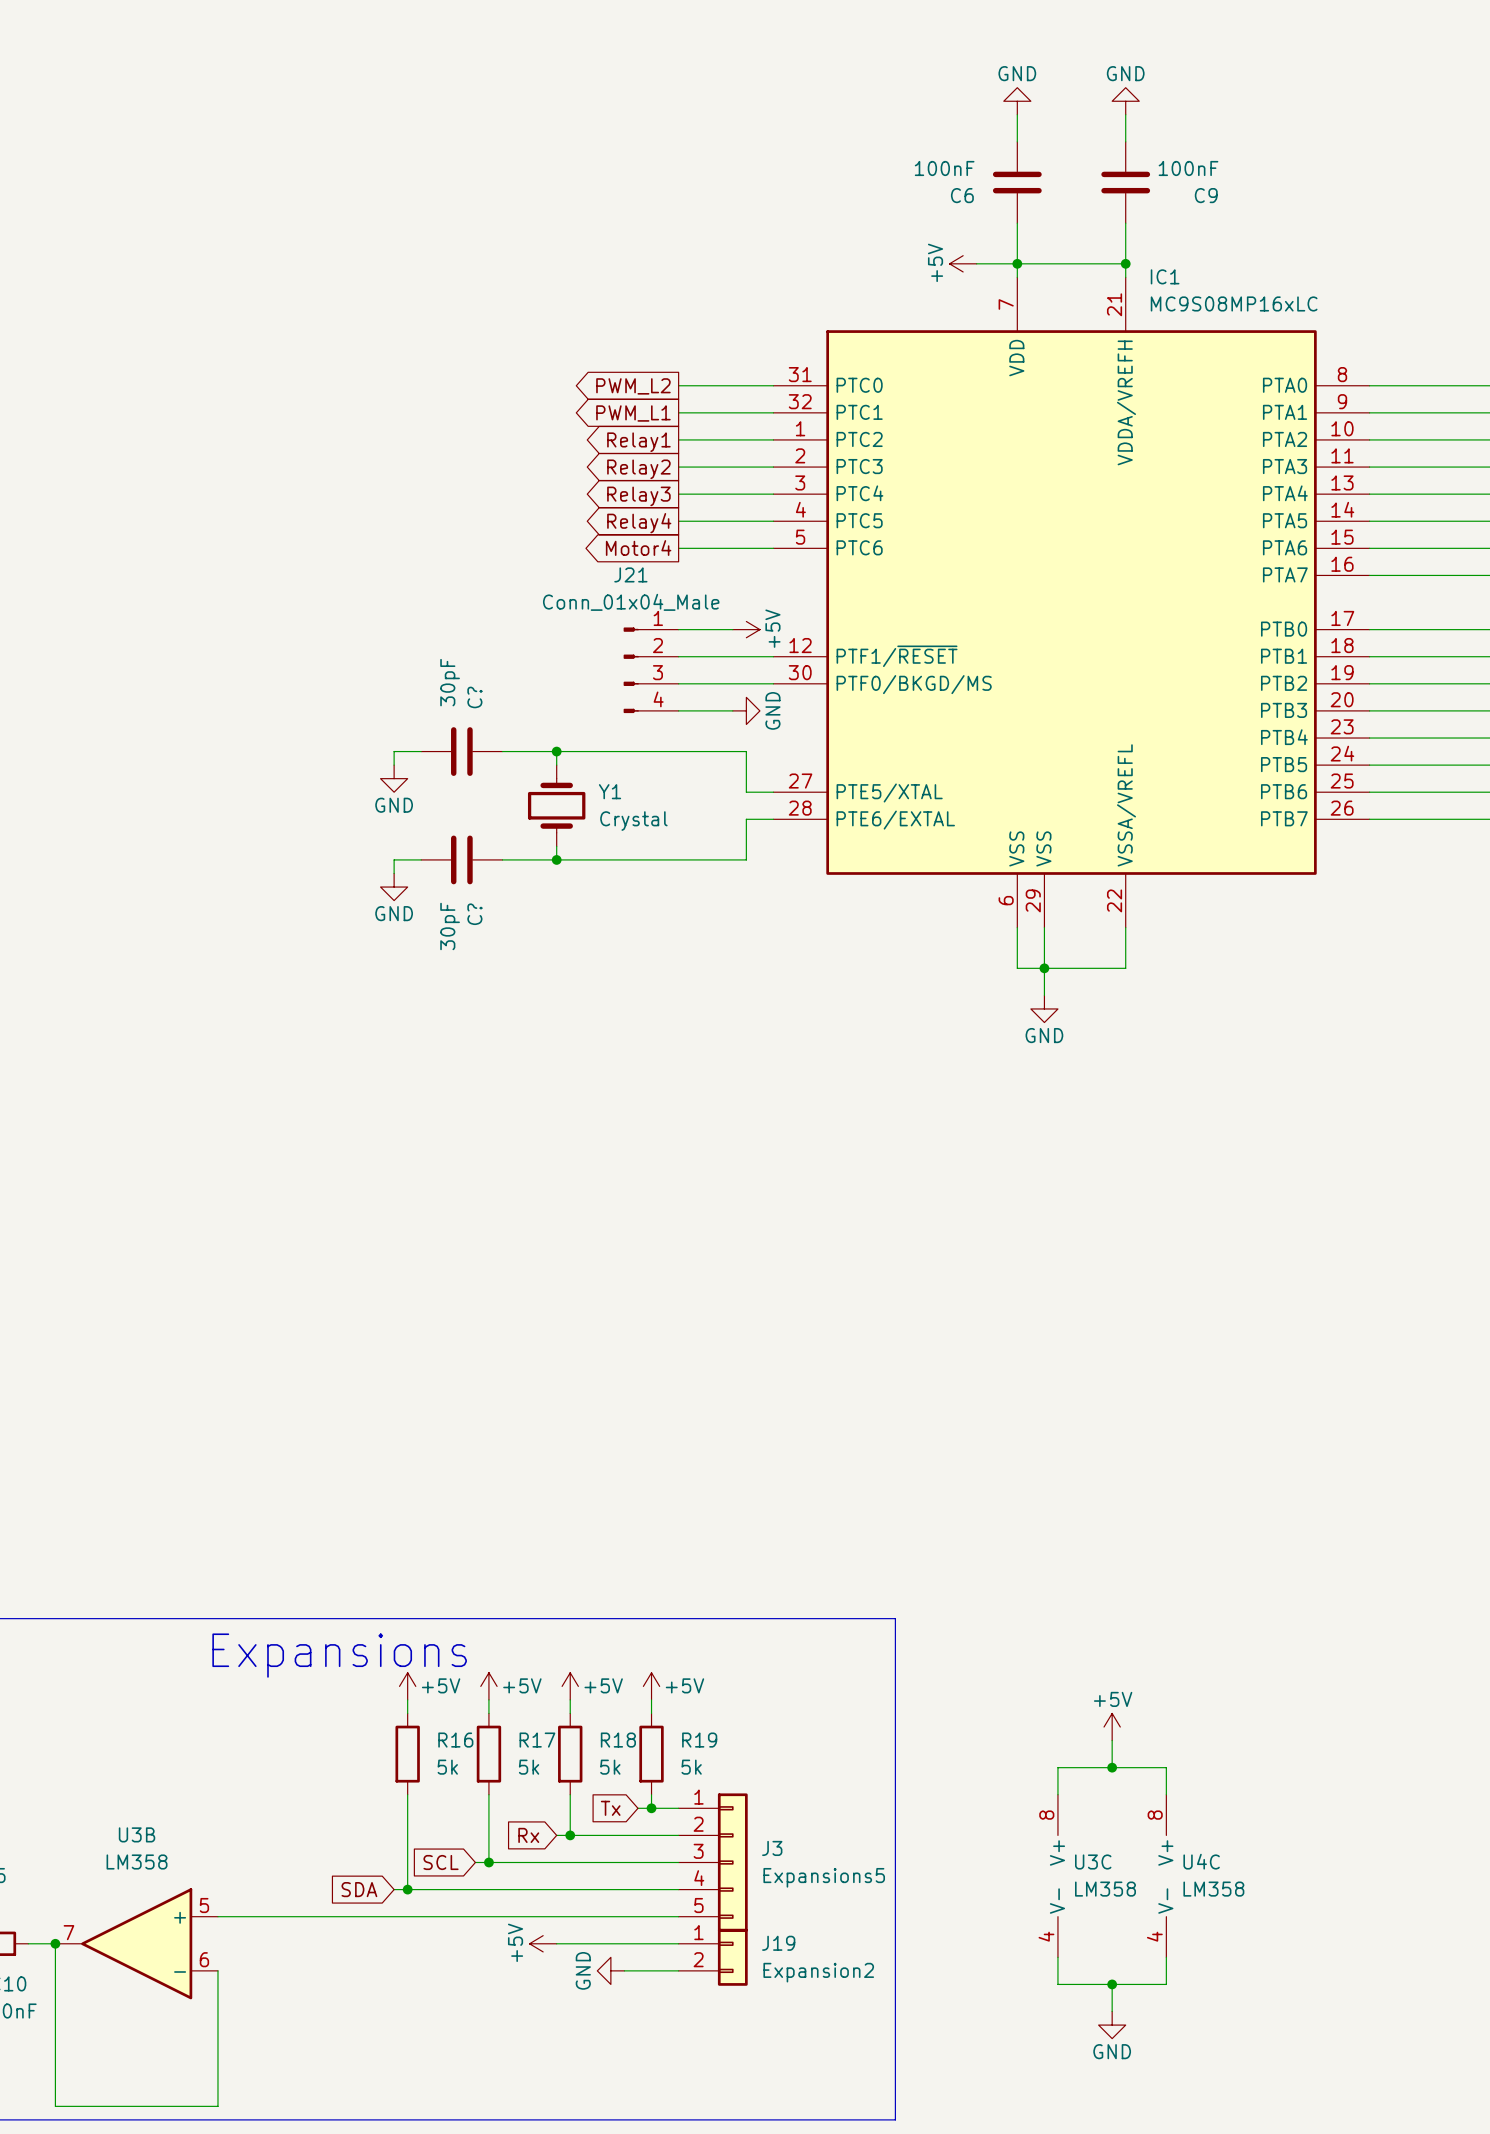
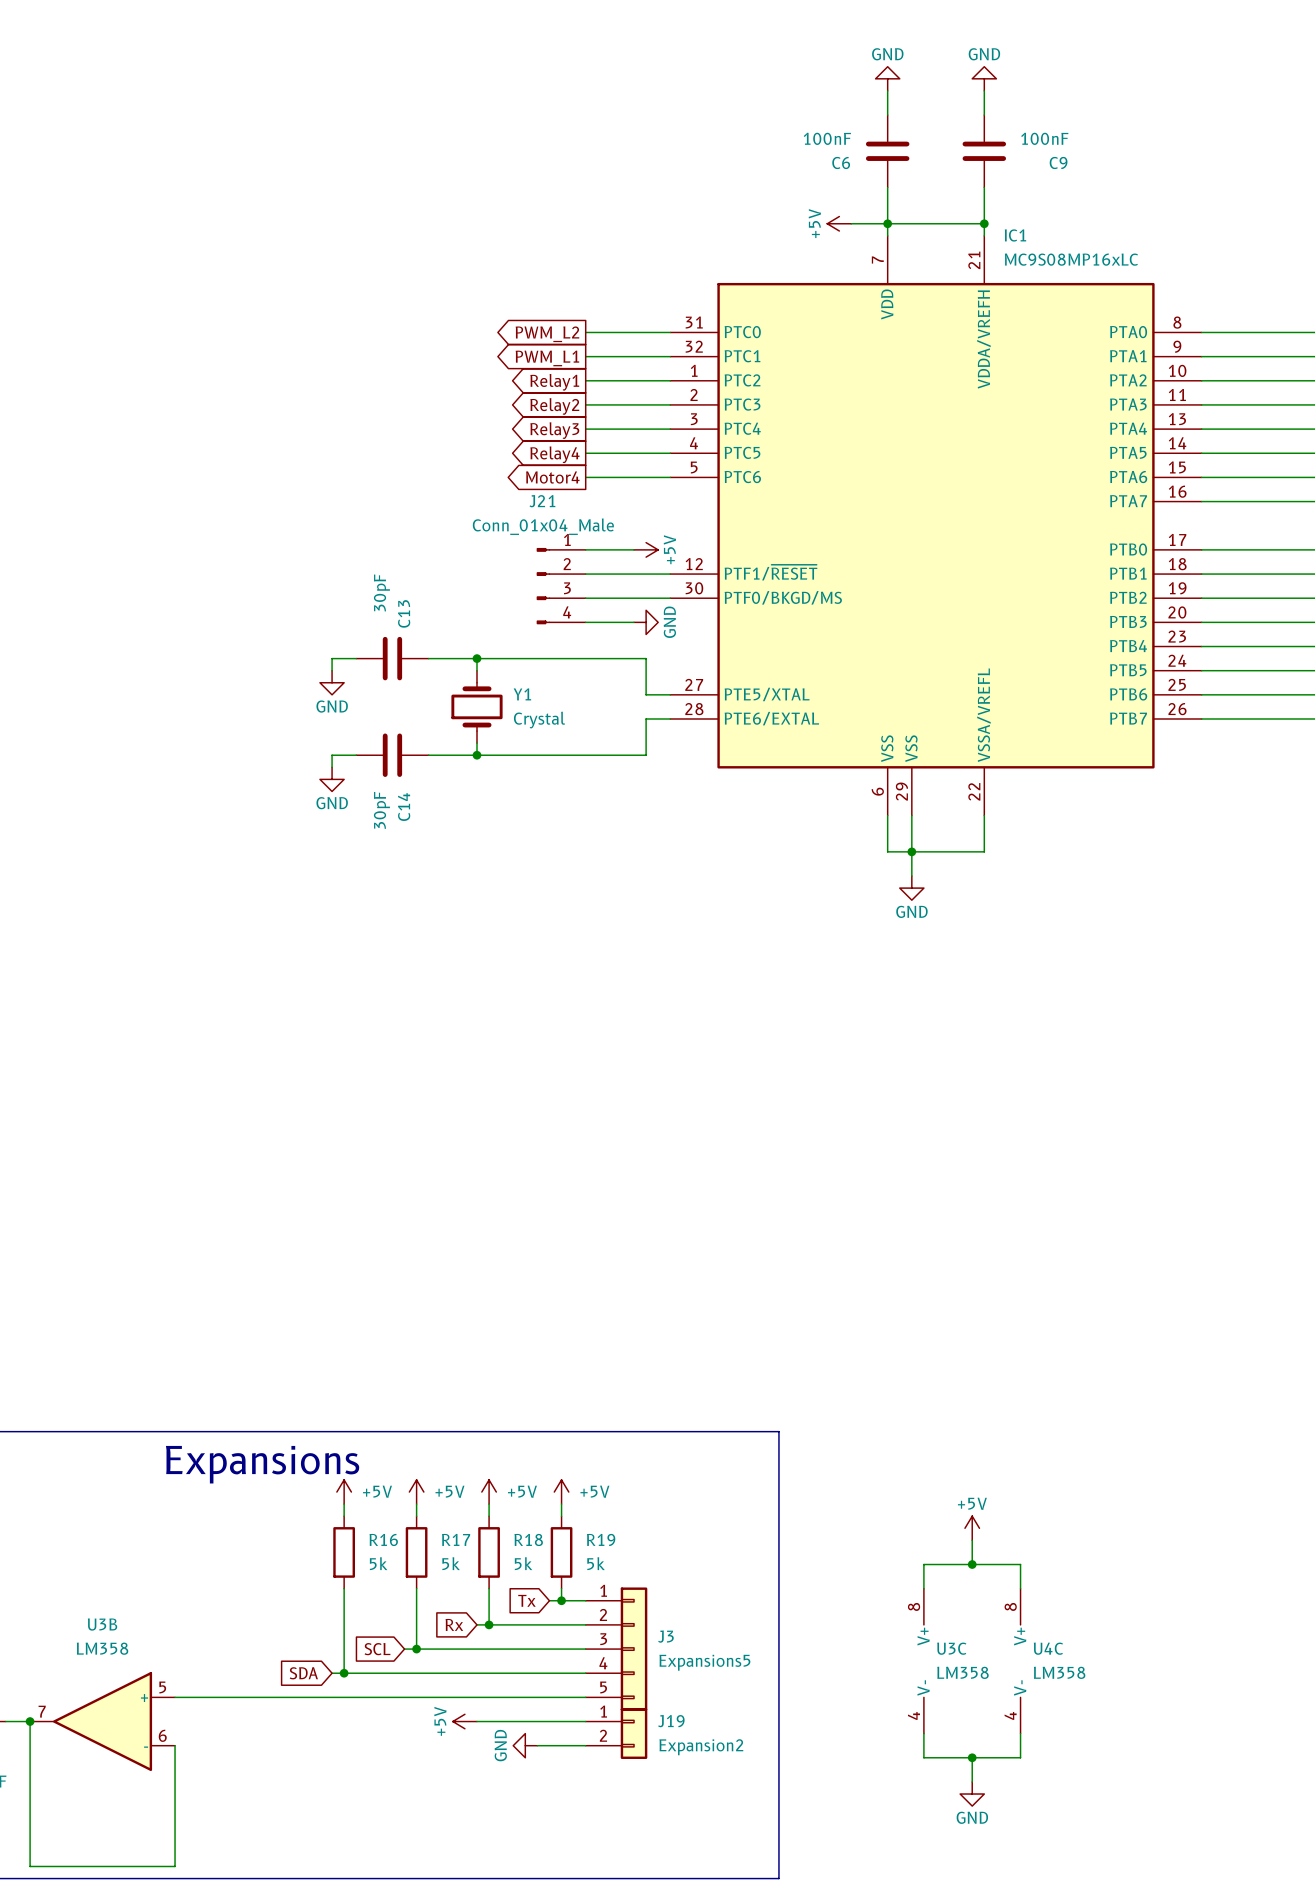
C? name: C? (474, 697) -> C13 (404, 613)
C? name: C? (474, 914) -> C14 (404, 807)

